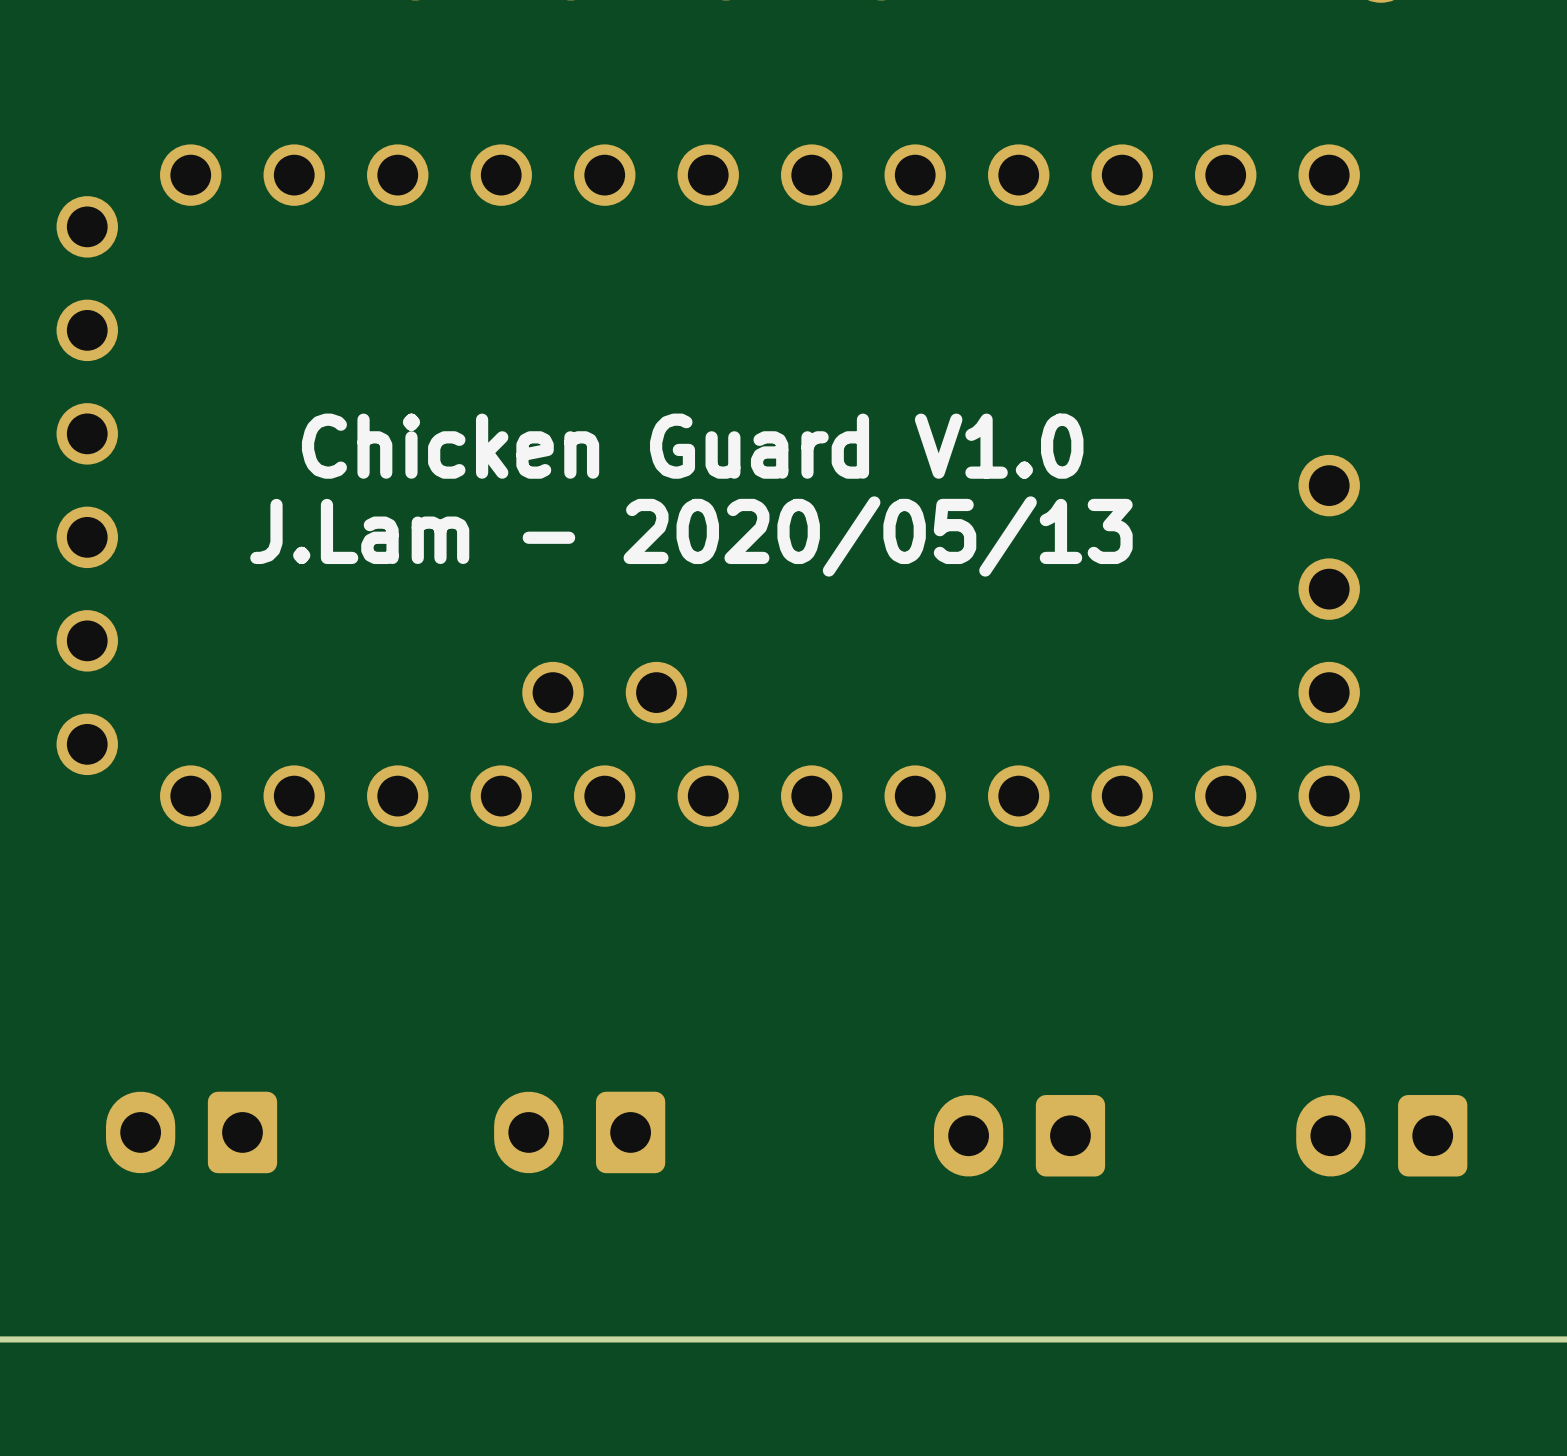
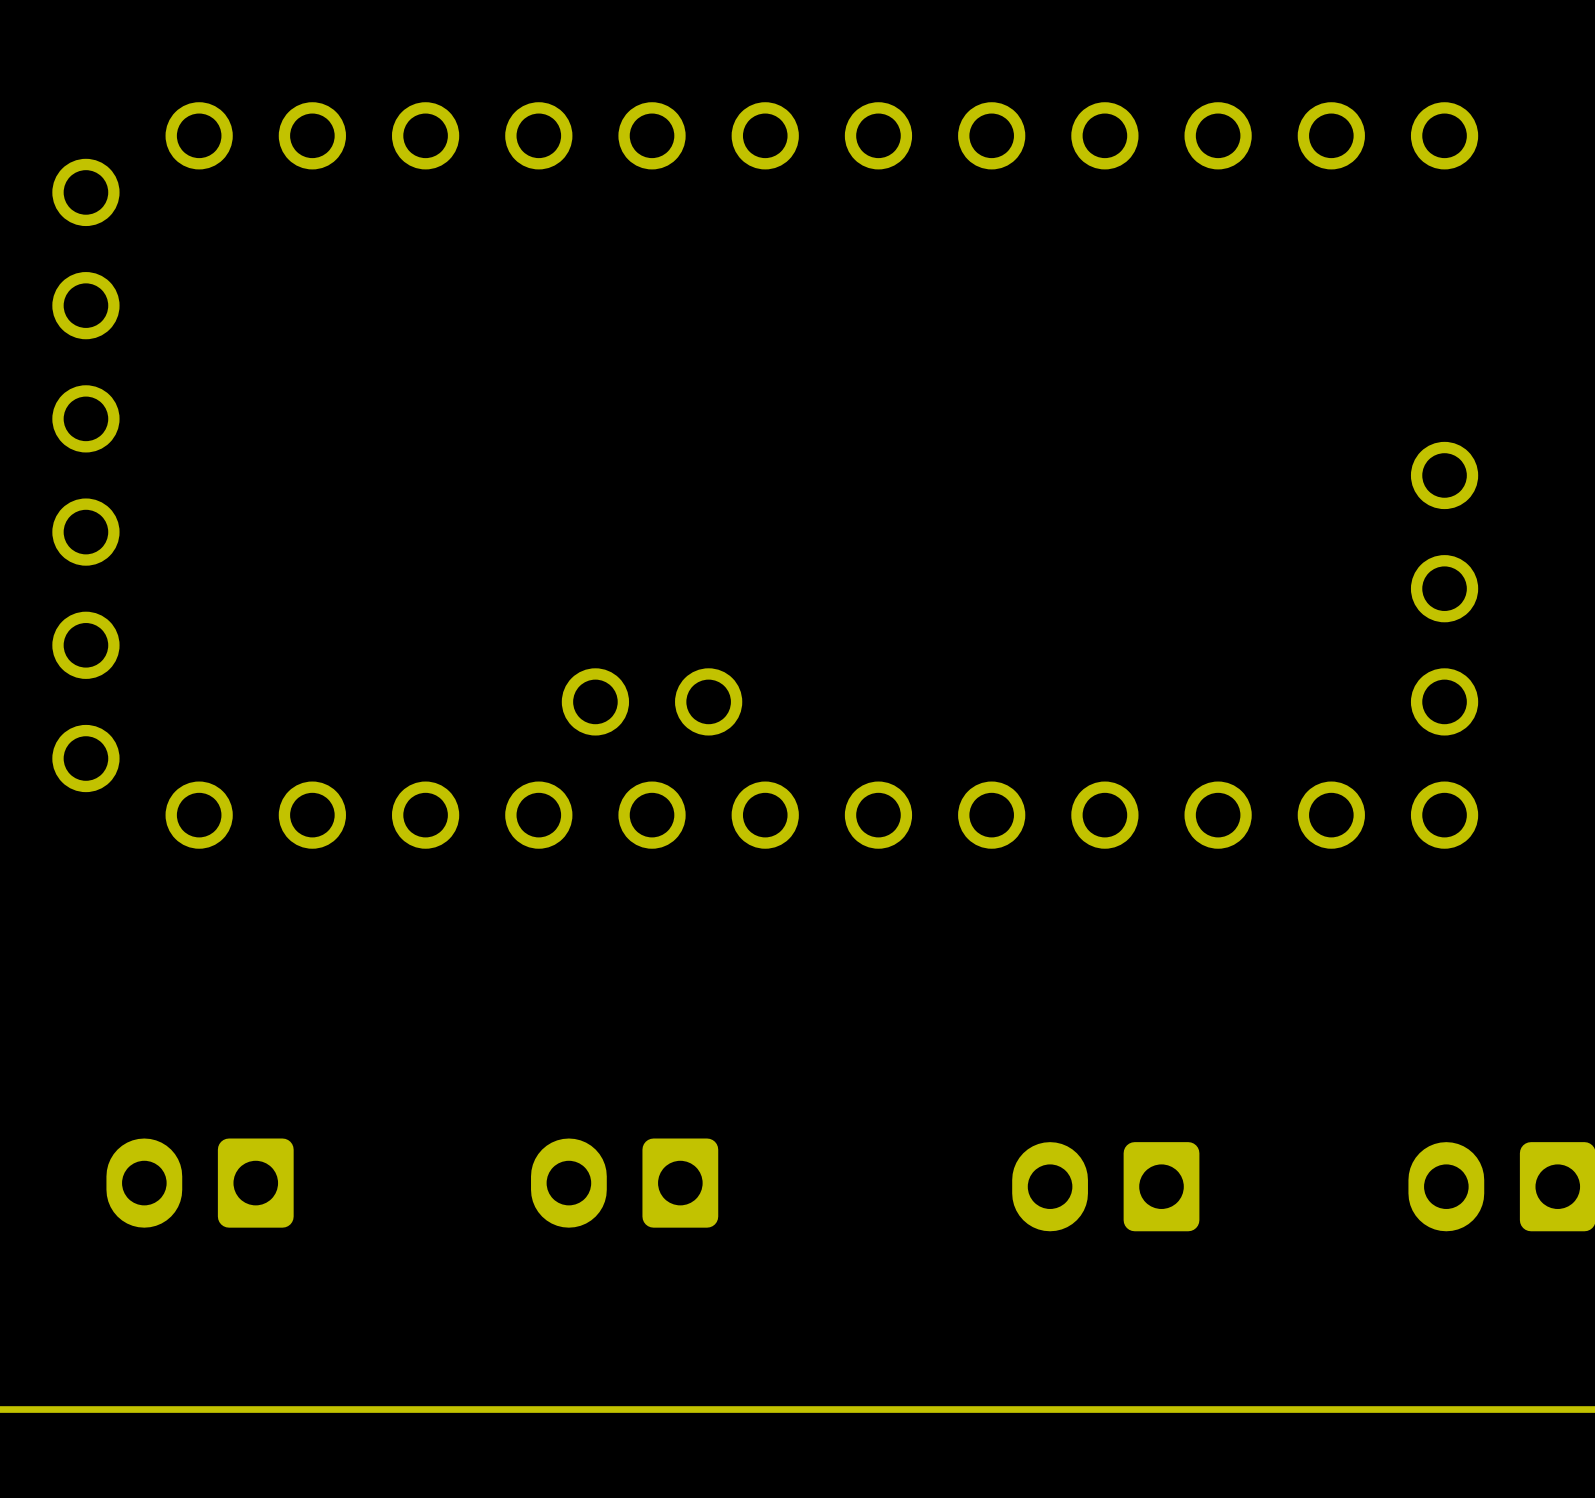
text: Chicken Guard V1.0 (692, 446) -> none
text: J.Lam - 2020/05/13 (691, 536) -> none

